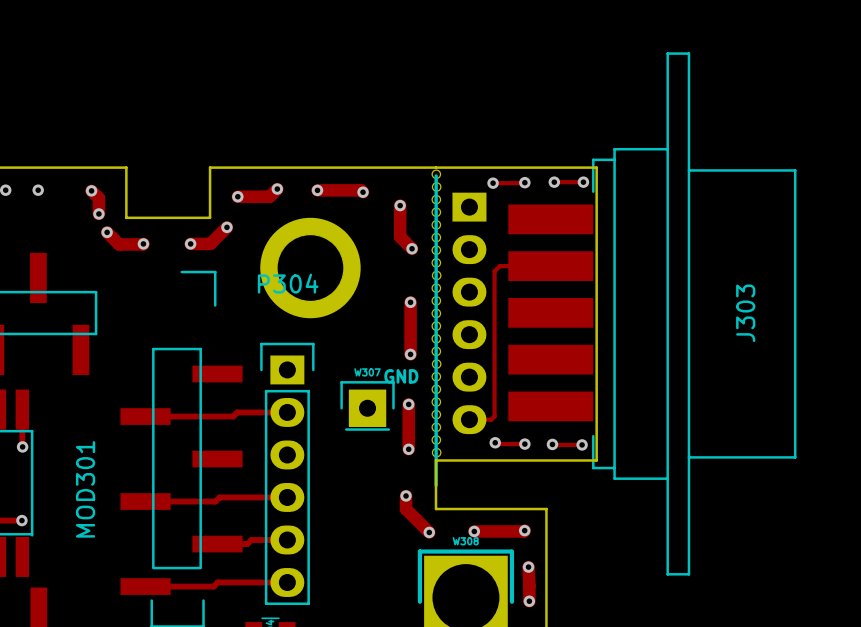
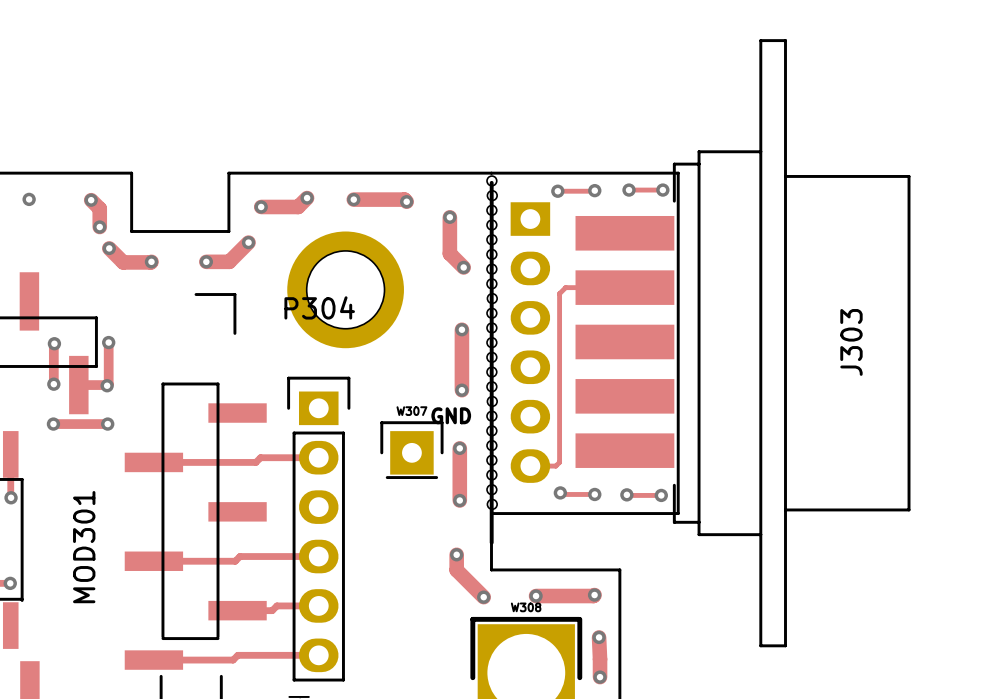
track: none -> (108, 342) (108, 384) (107, 385) (78, 385)
via: none -> (108, 342)
track: none -> (54, 343) (53, 384)
via: none -> (54, 343)
via: none -> (53, 384)
via: none -> (107, 385)
track: none -> (53, 424) (107, 424)
via: none -> (53, 424)
via: none -> (107, 424)

